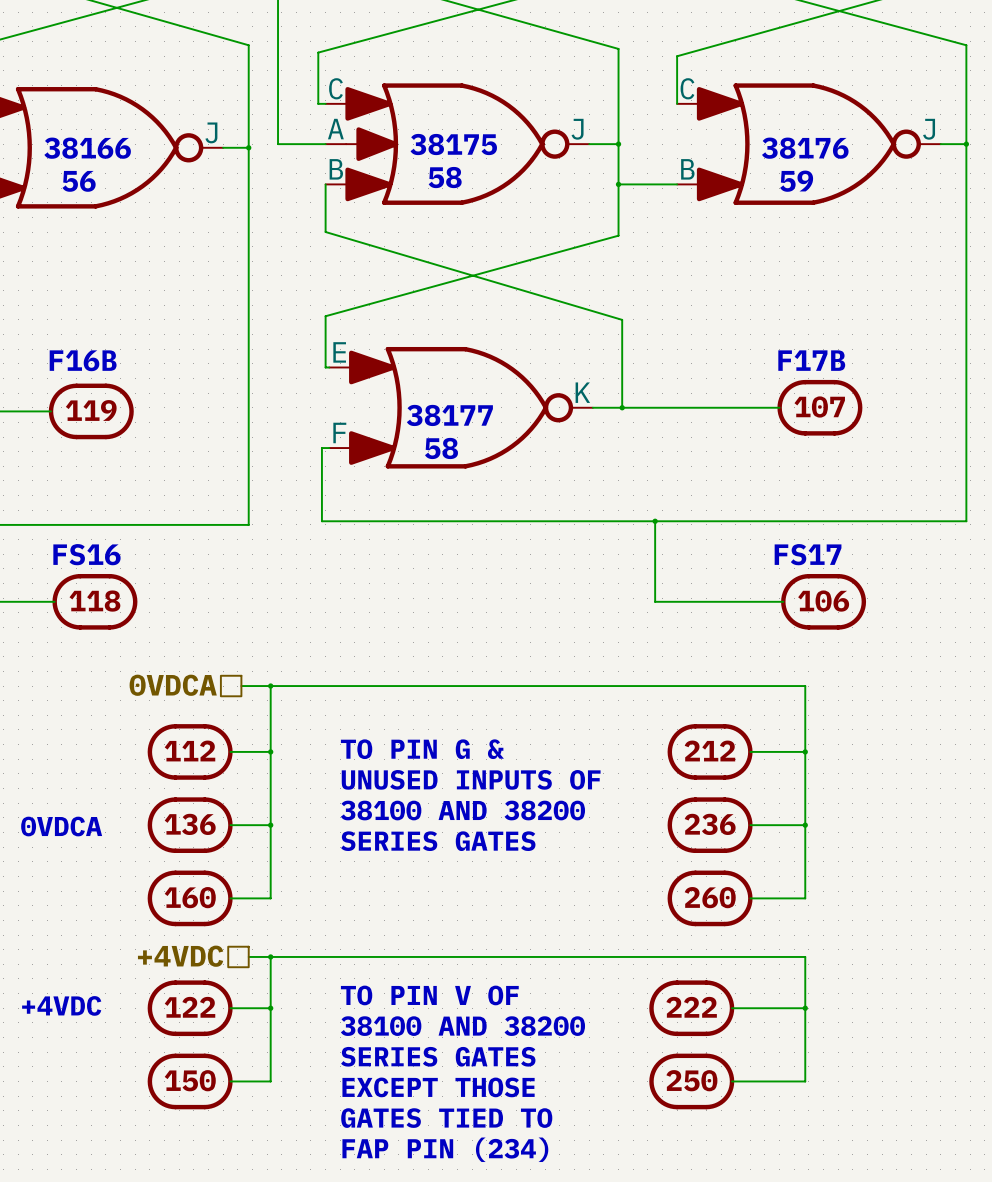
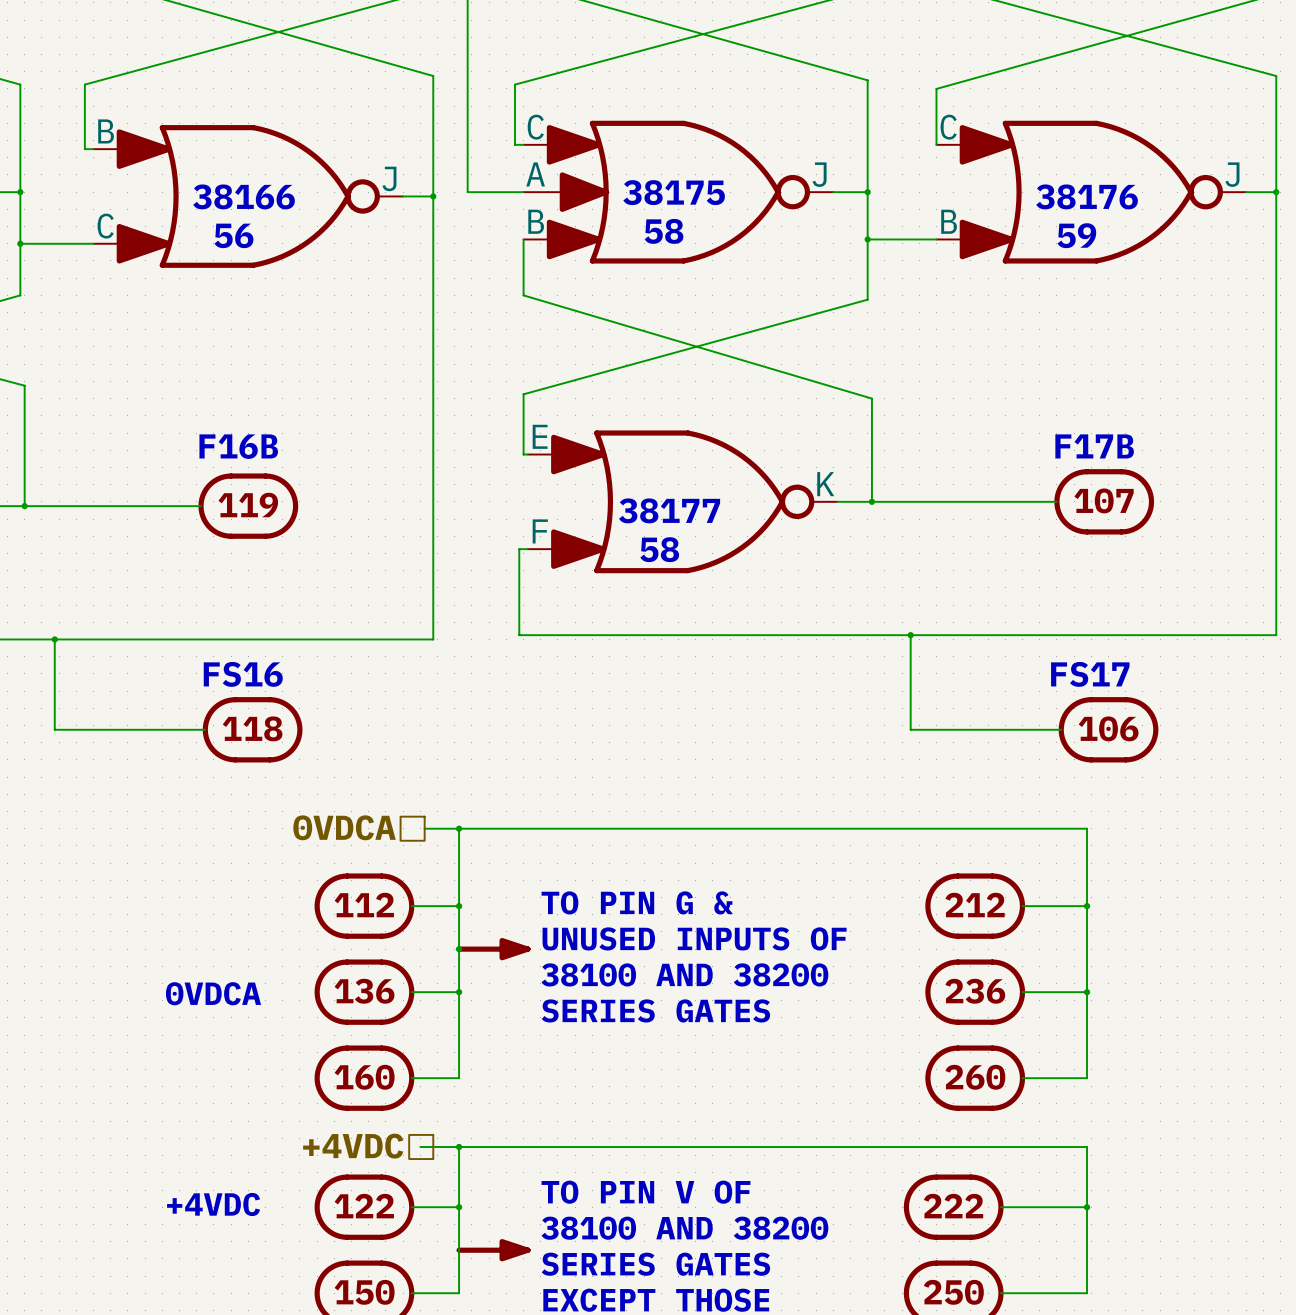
junction: none -> (459, 949)
power symbol: none -> (493, 949)
wire: none -> (420, 1146) (433, 1146)
power symbol: none -> (493, 1250)

